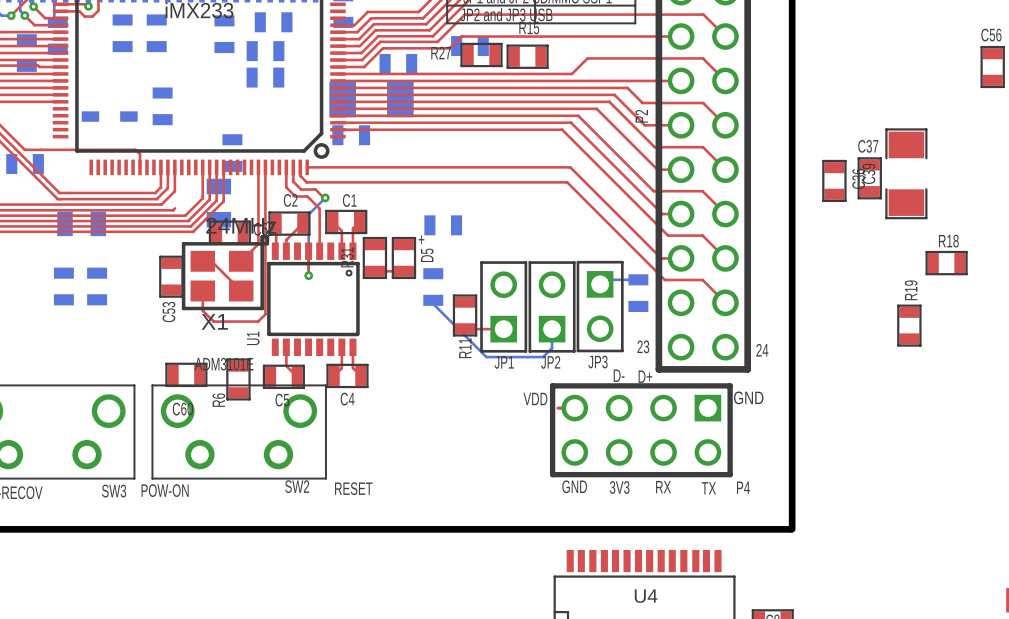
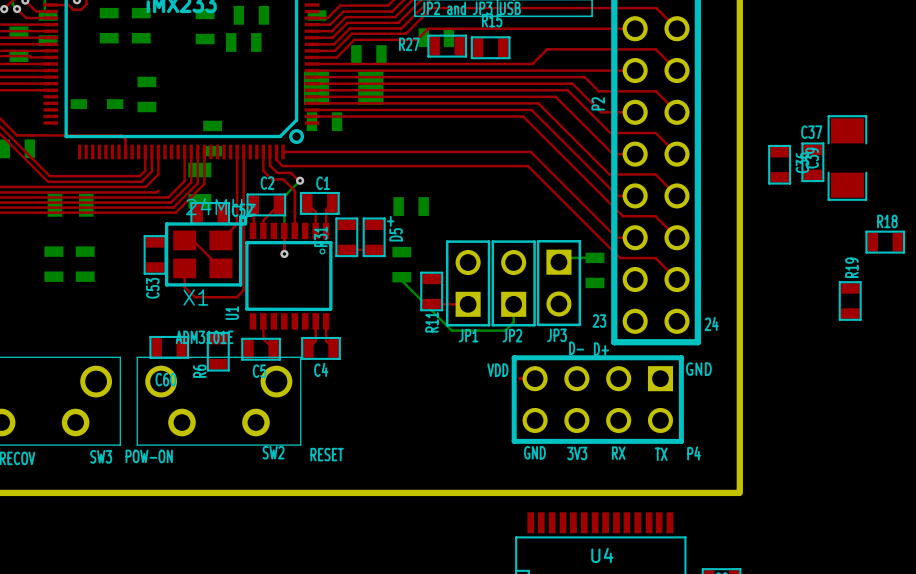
part: (265, 77) -> none

